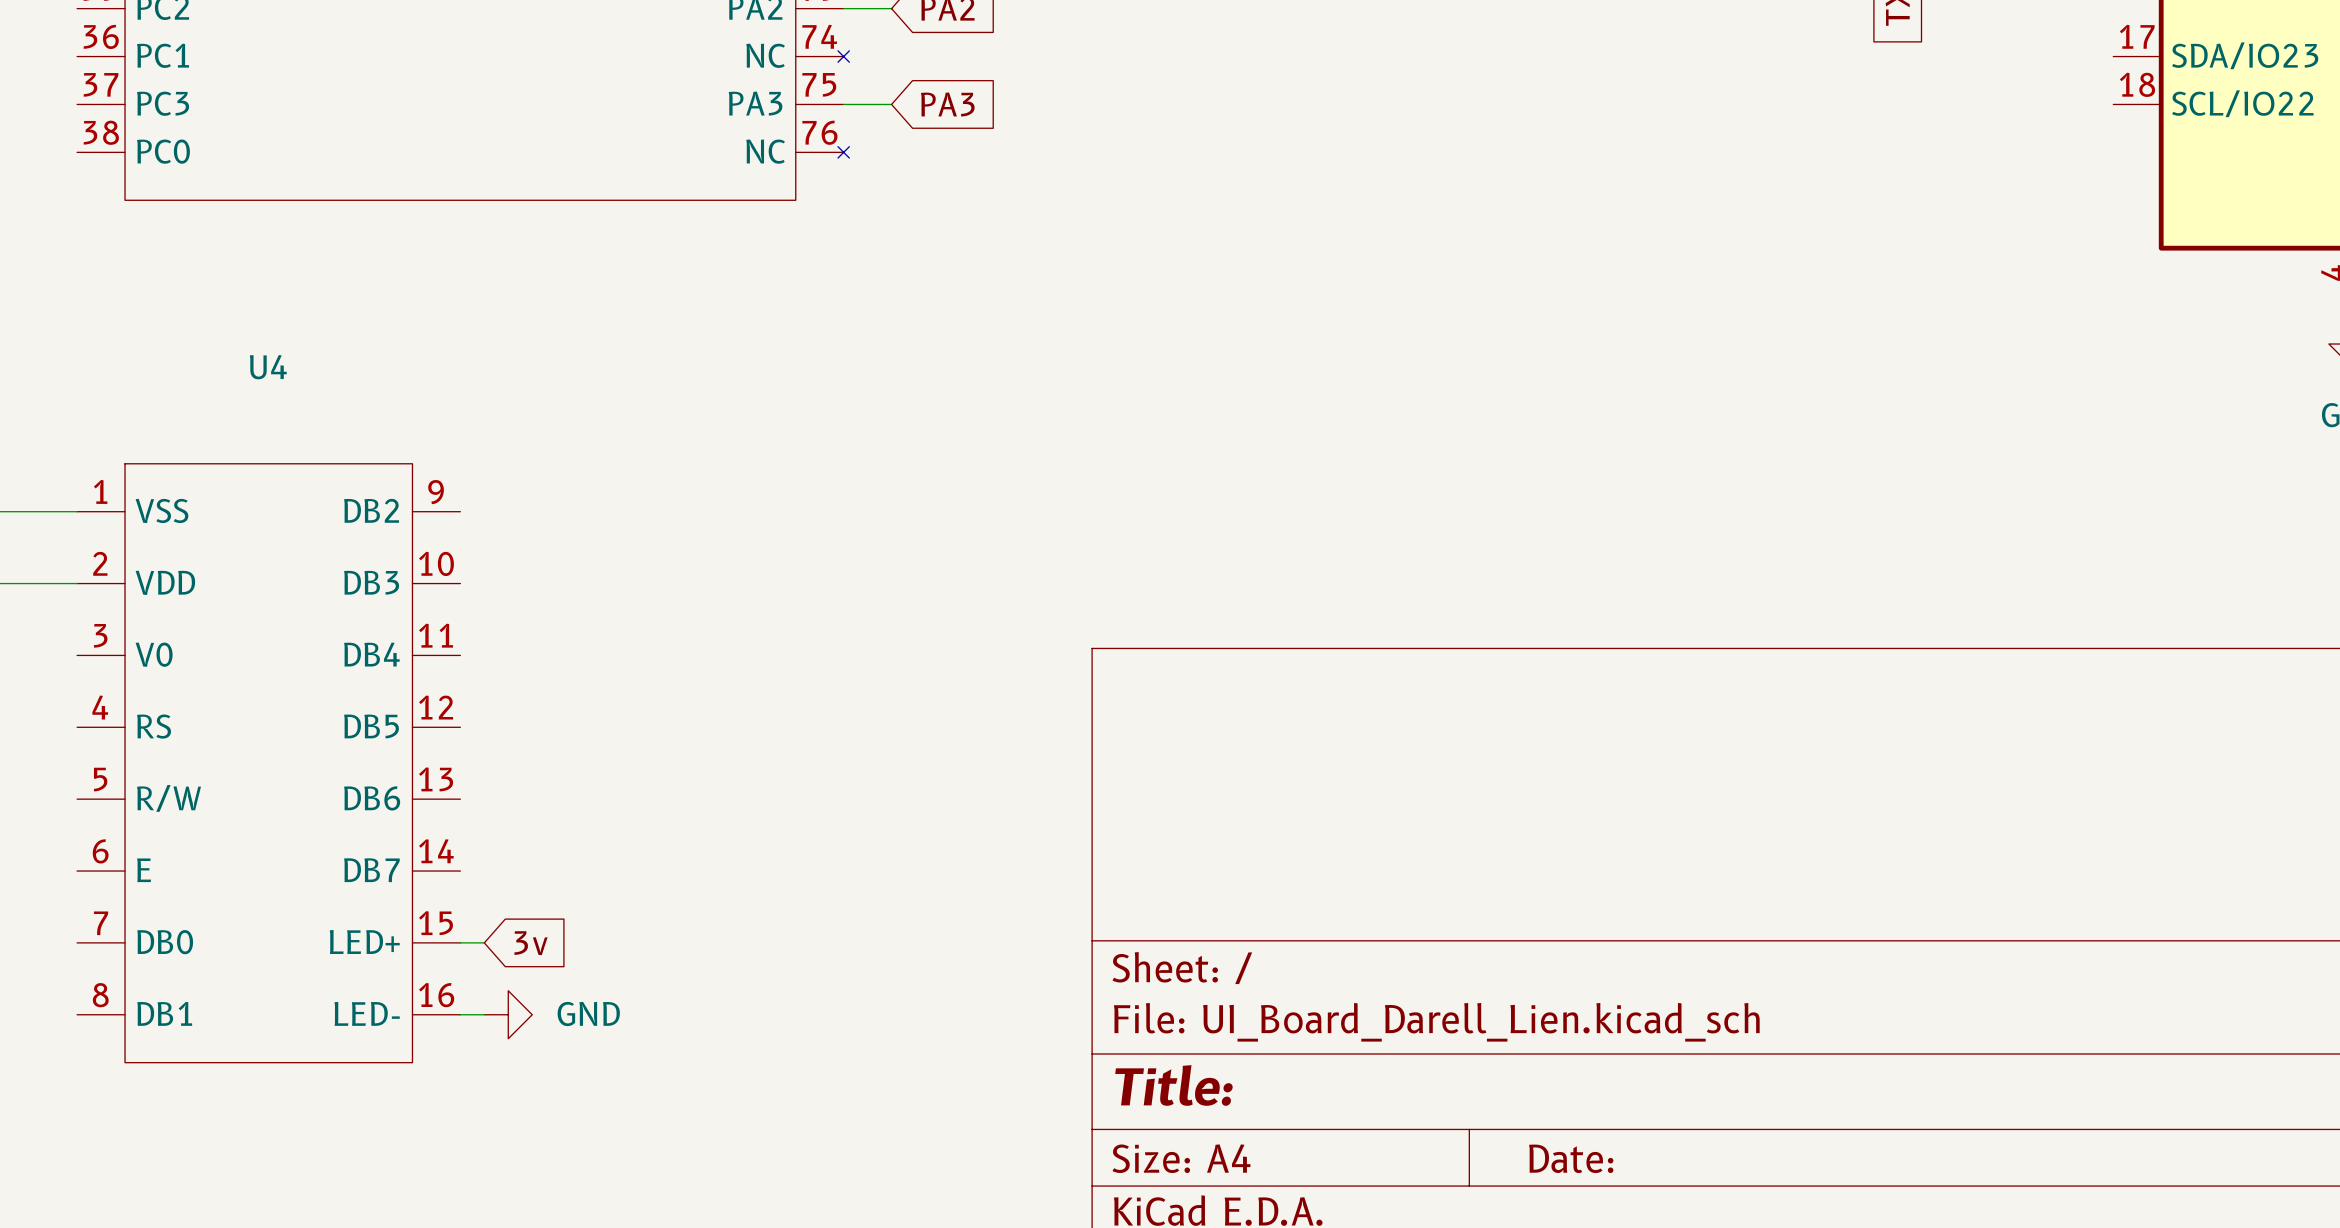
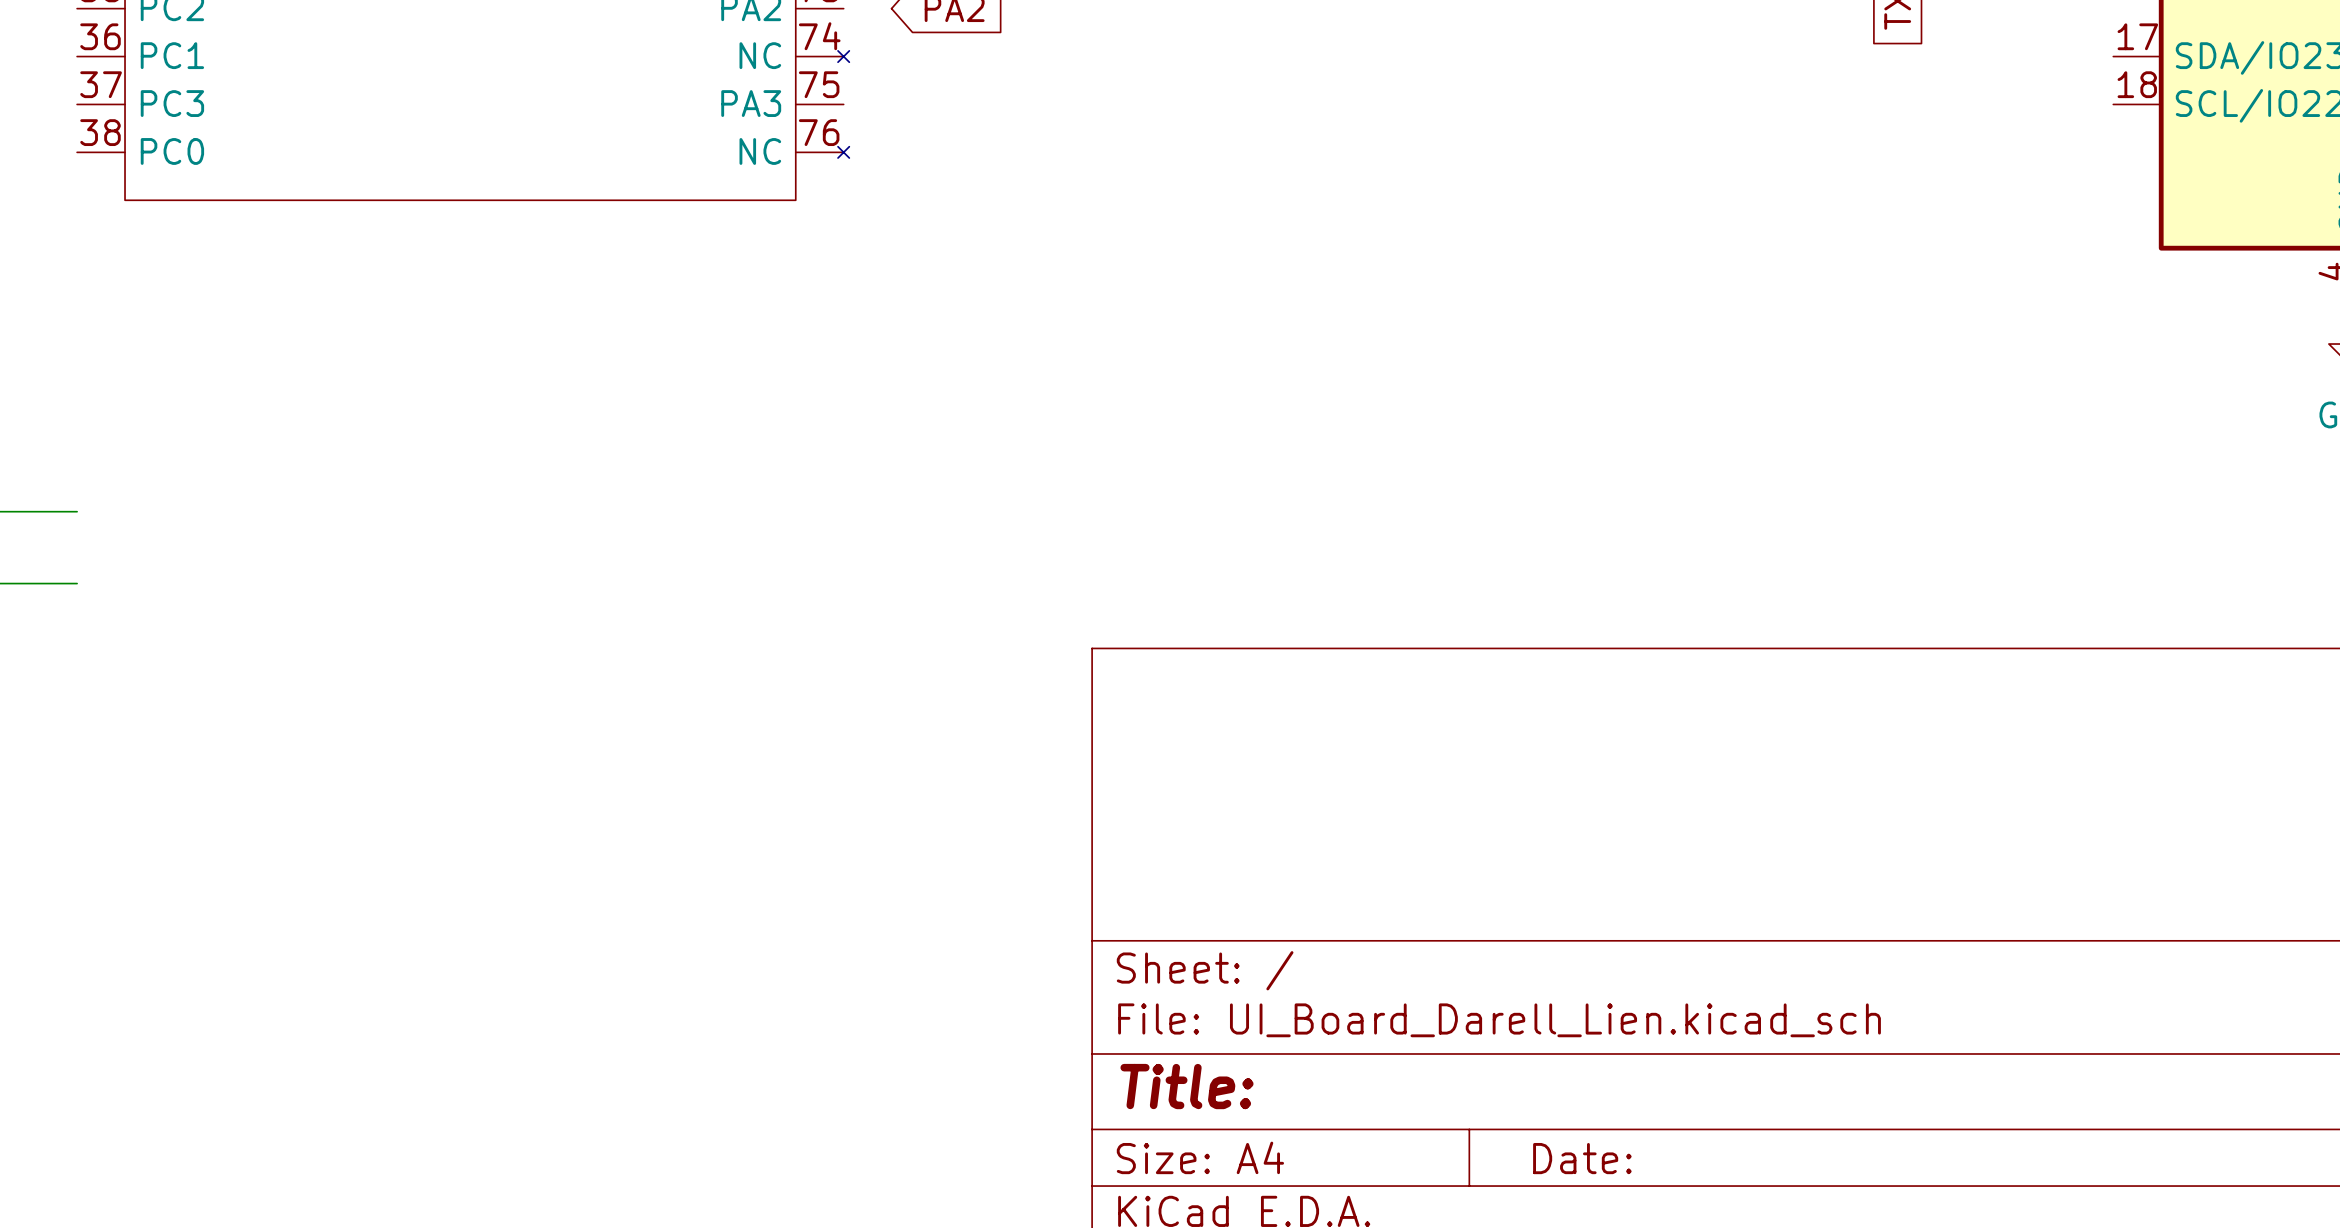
wire: (843, 8) (891, 8) -> none
wire: (843, 104) (891, 104) -> none
global label: PA3 (947, 104) -> none
U4: (268, 763) -> none
wire: (460, 942) (484, 942) -> none
global label: 3v (531, 943) -> none
wire: (460, 1014) (484, 1014) -> none
power symbol: GND (508, 1014) -> none

